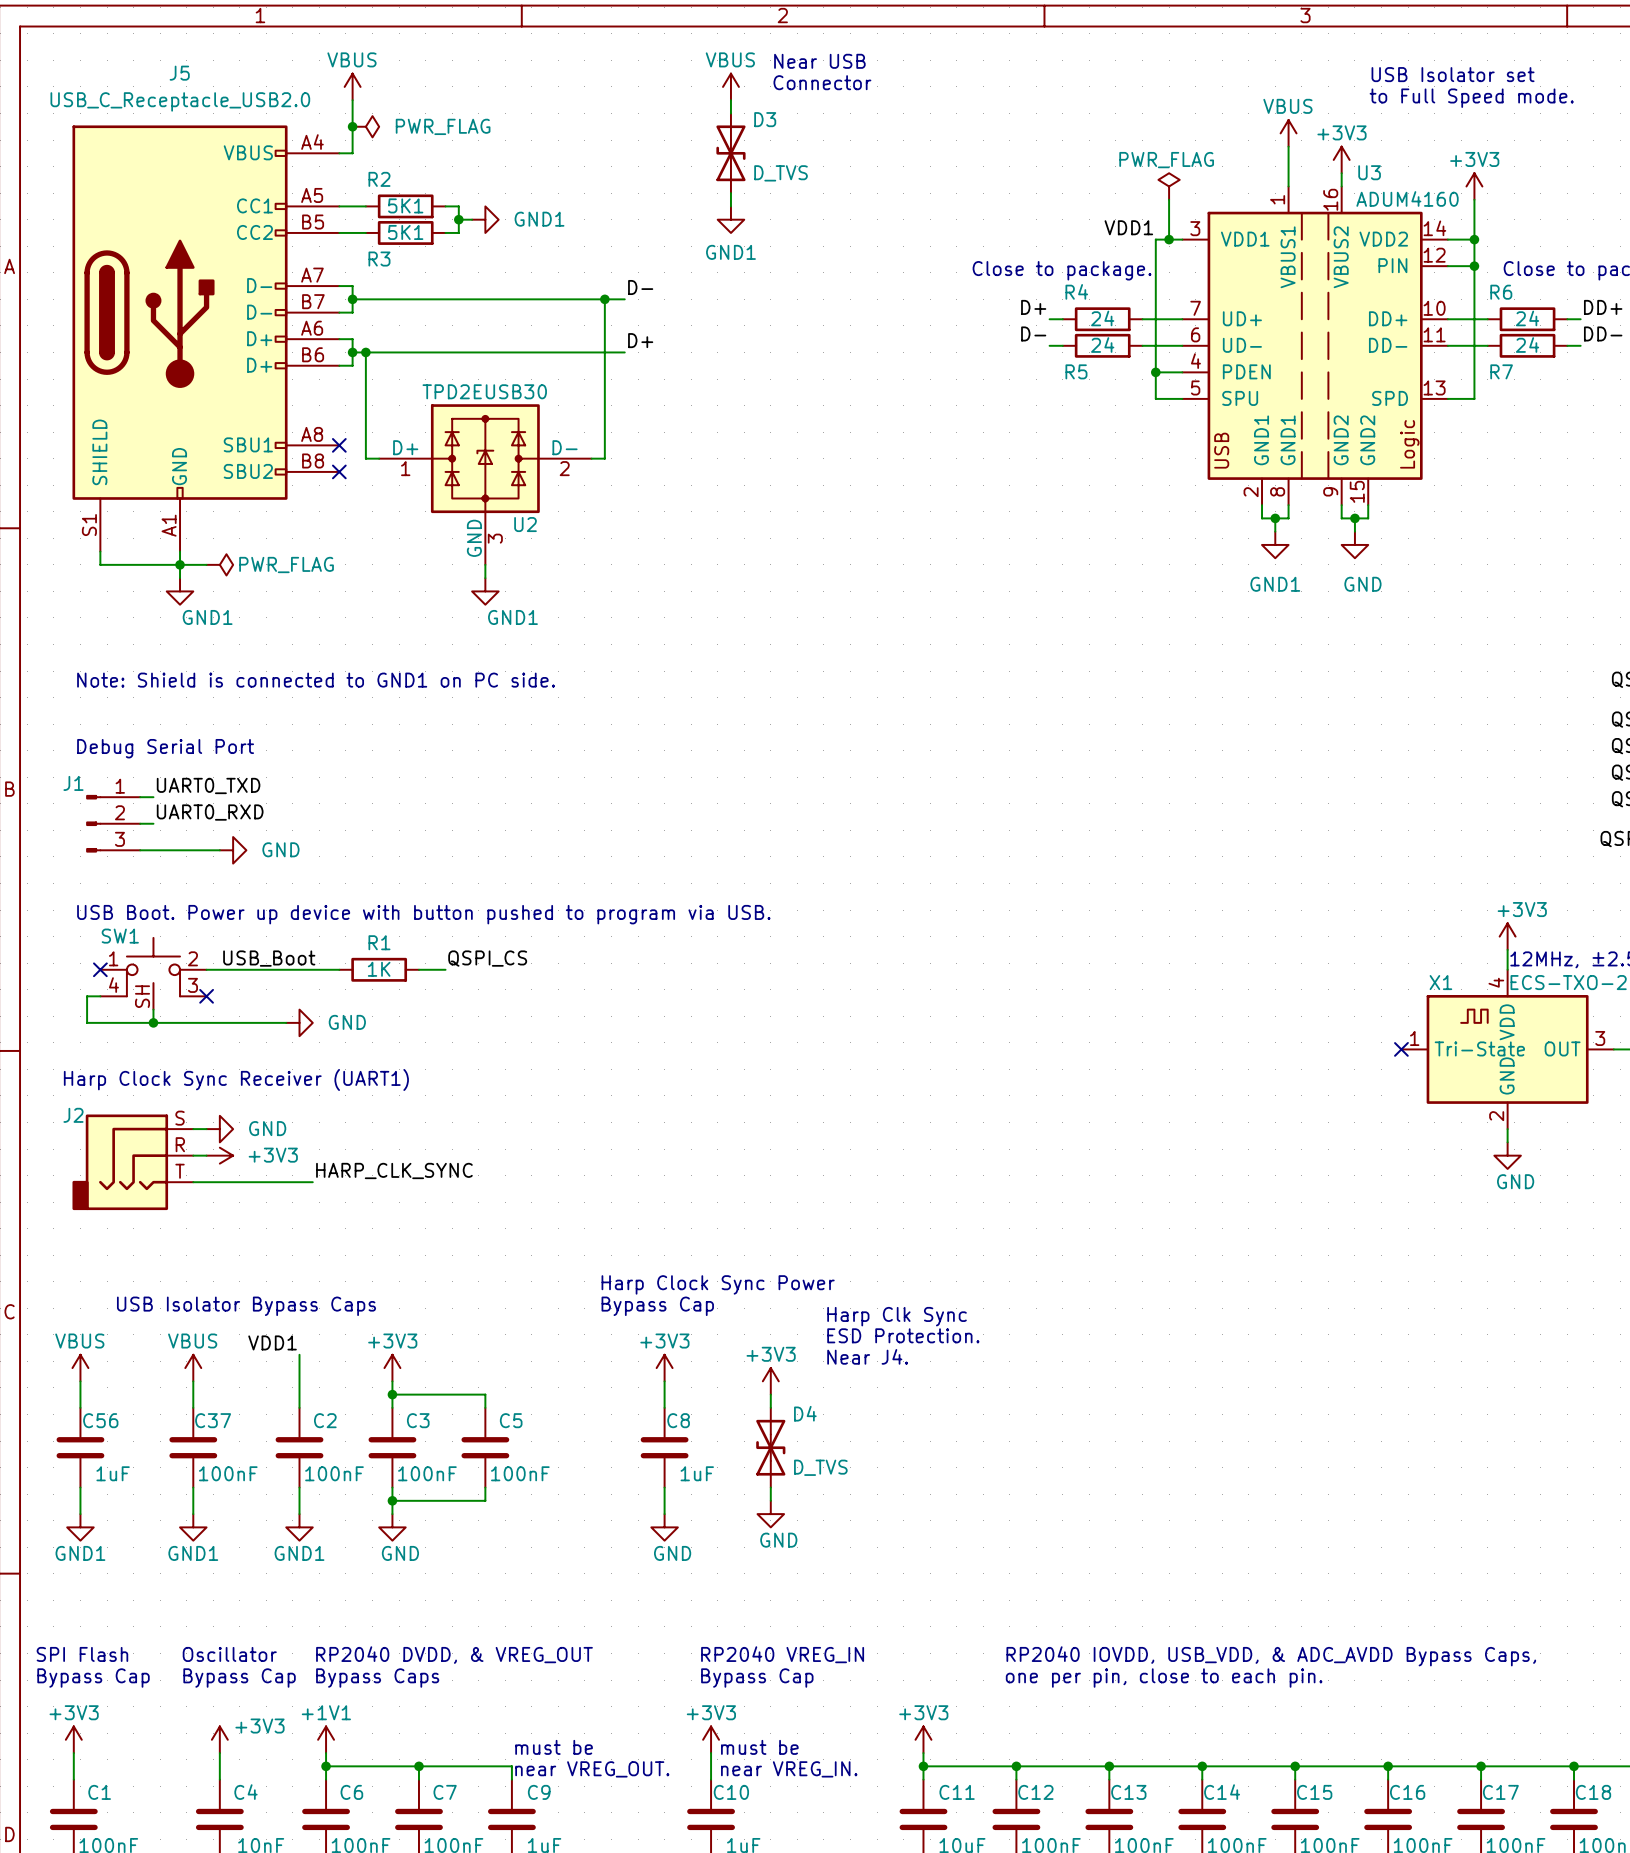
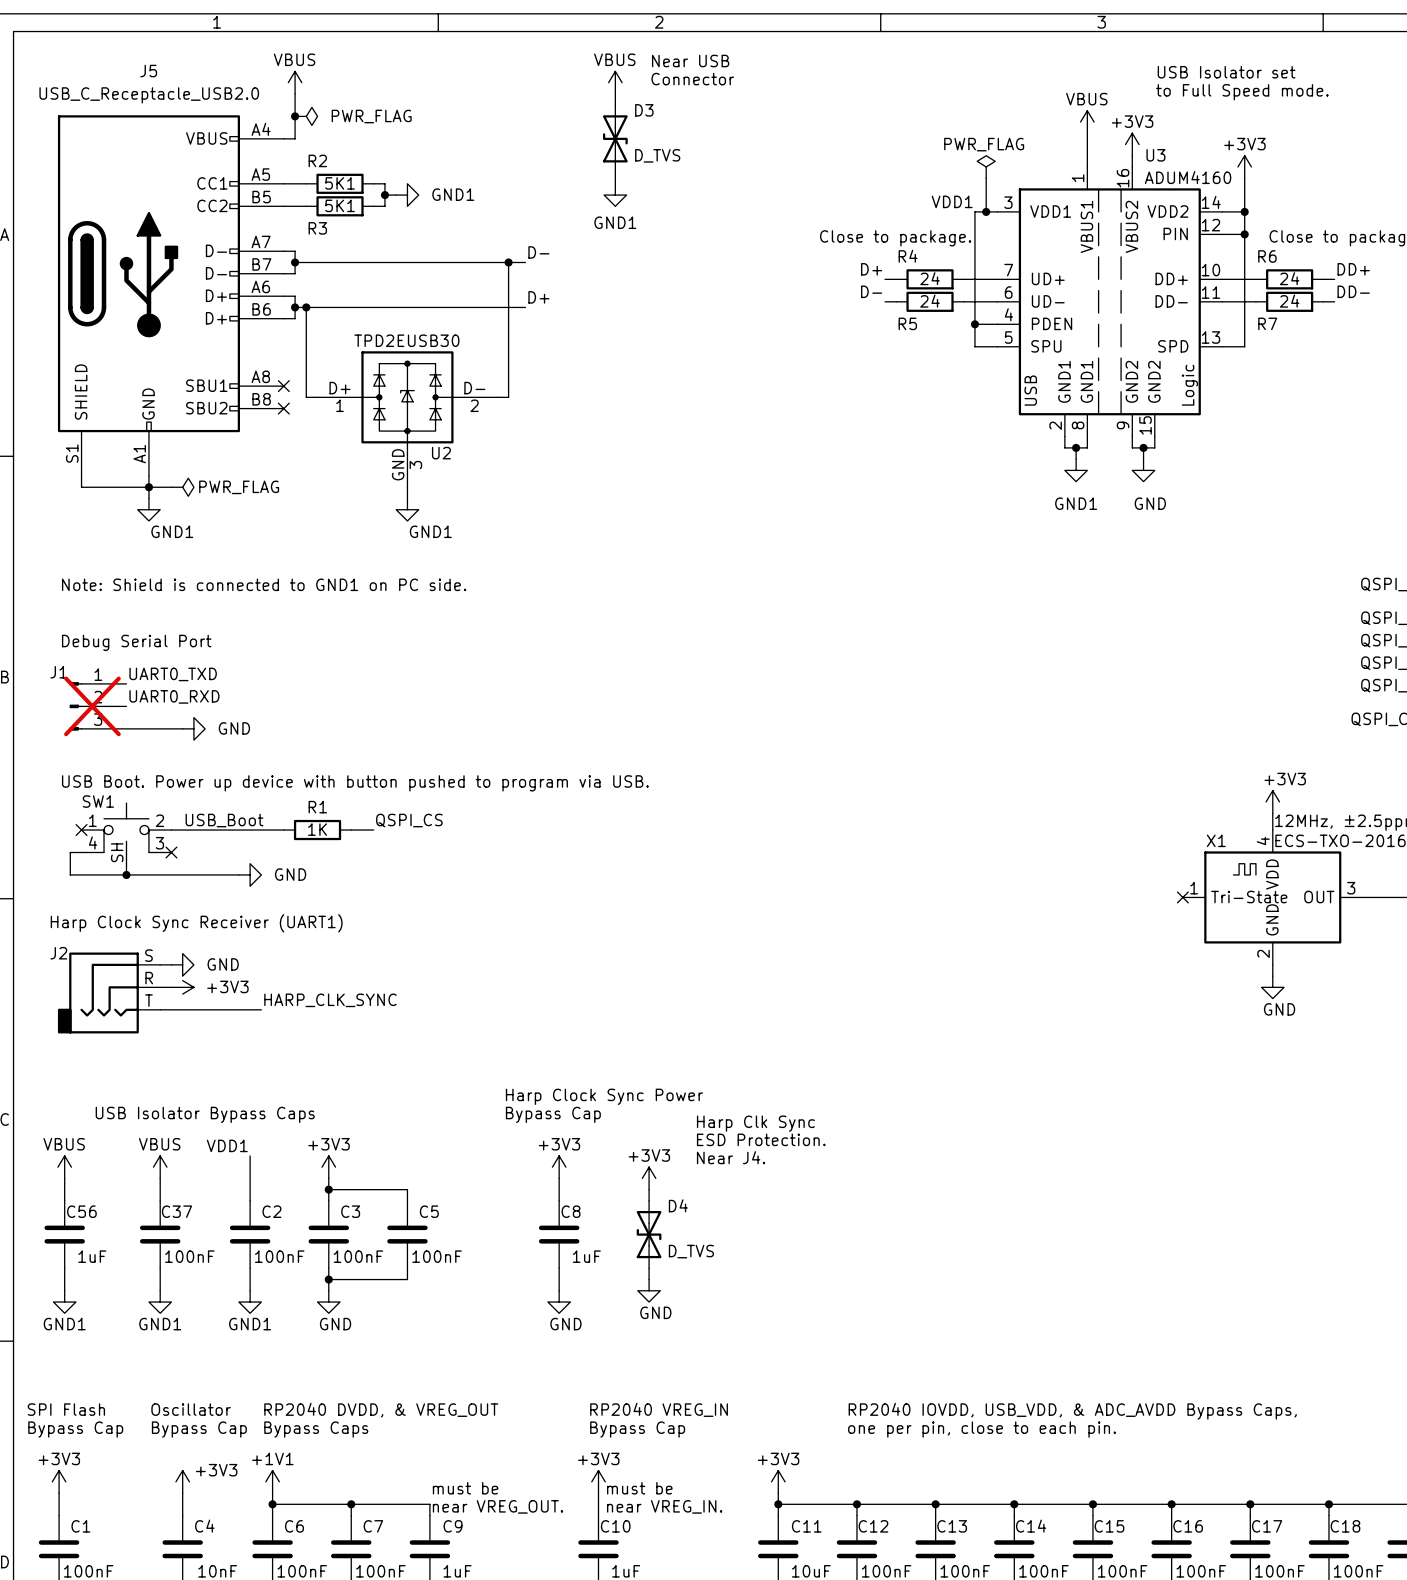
J1 do-not-place cross: none -> (92, 706)

